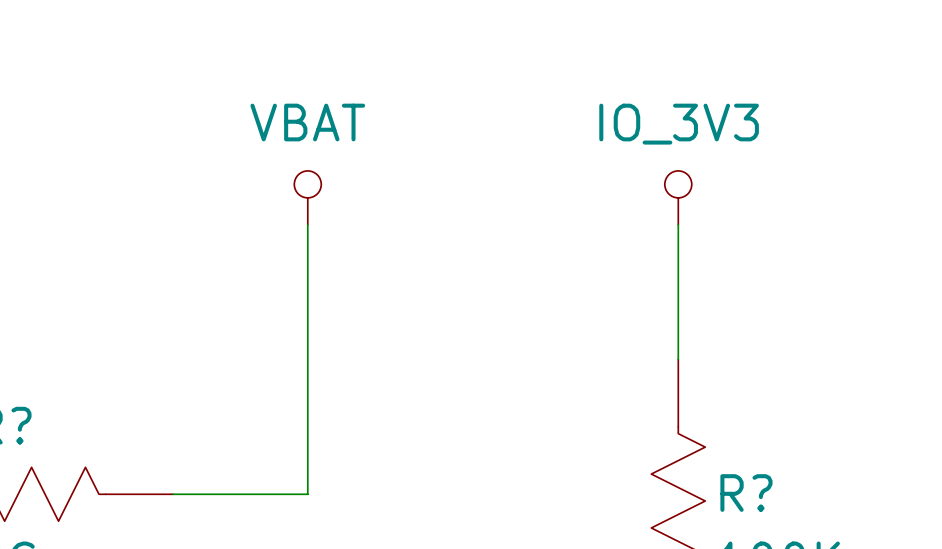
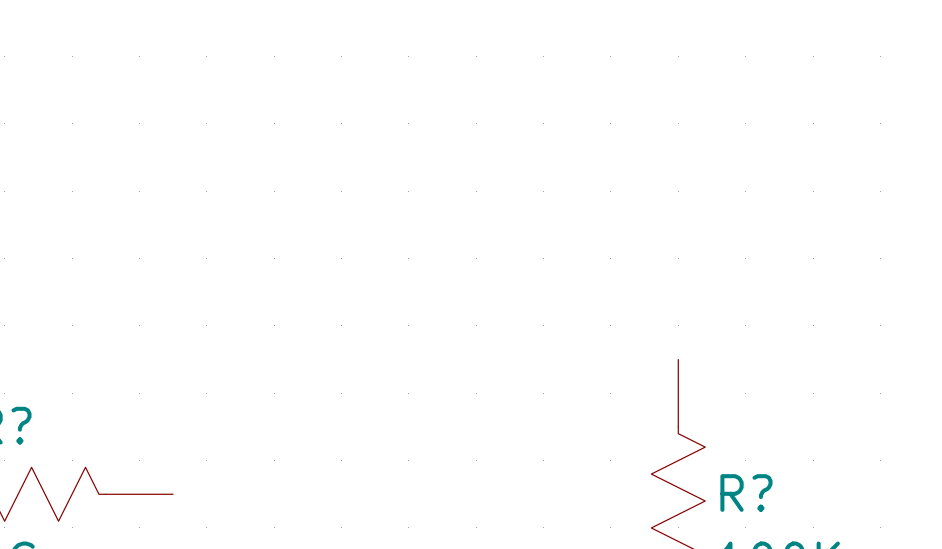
power symbol: VBAT (307, 197) -> none
power symbol: IO_3V3 (678, 197) -> none
wire: (307, 224) (307, 494) (173, 494) -> none
wire: (678, 224) (678, 359) -> none

